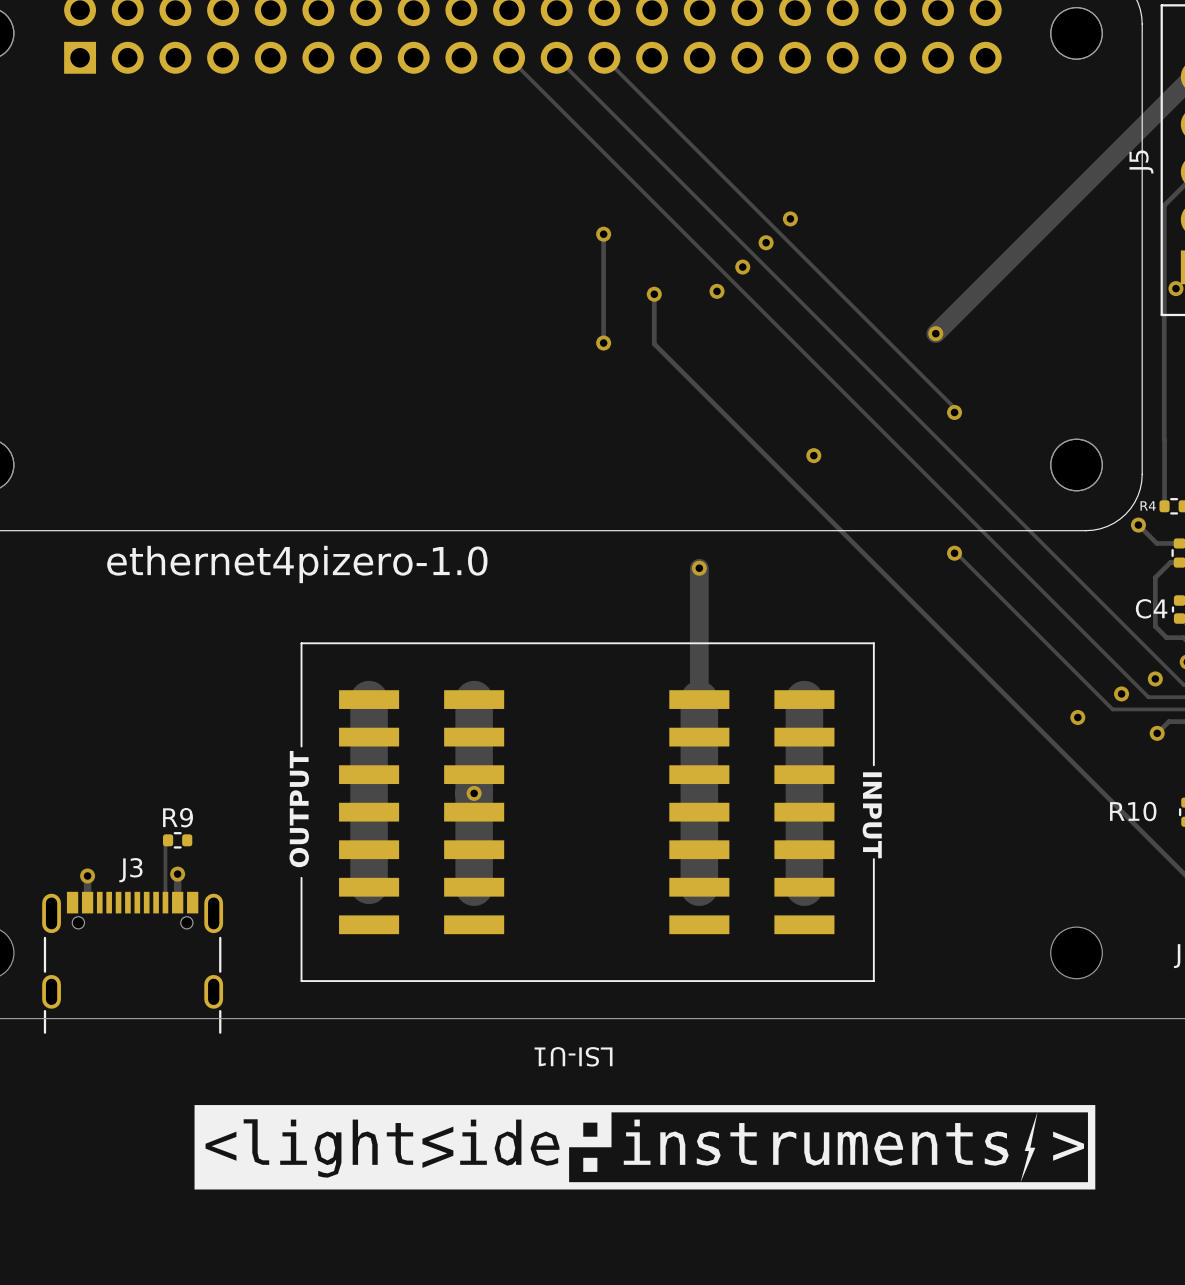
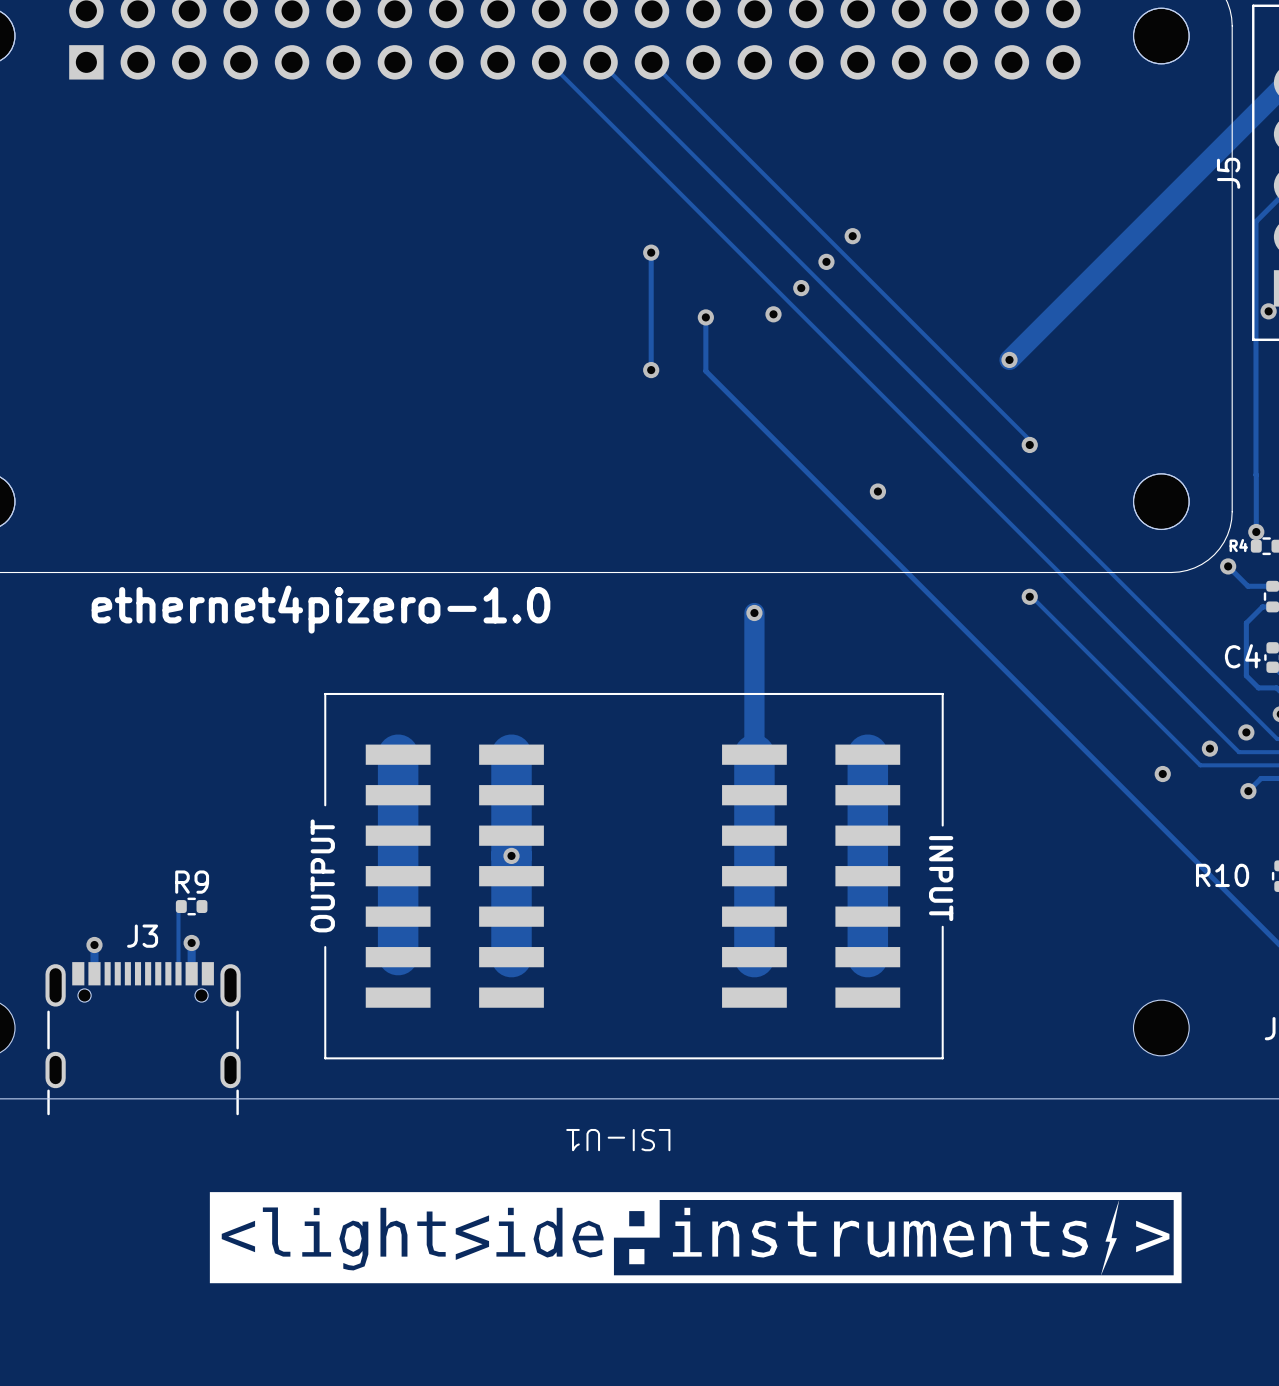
via: none -> (1256, 532)

